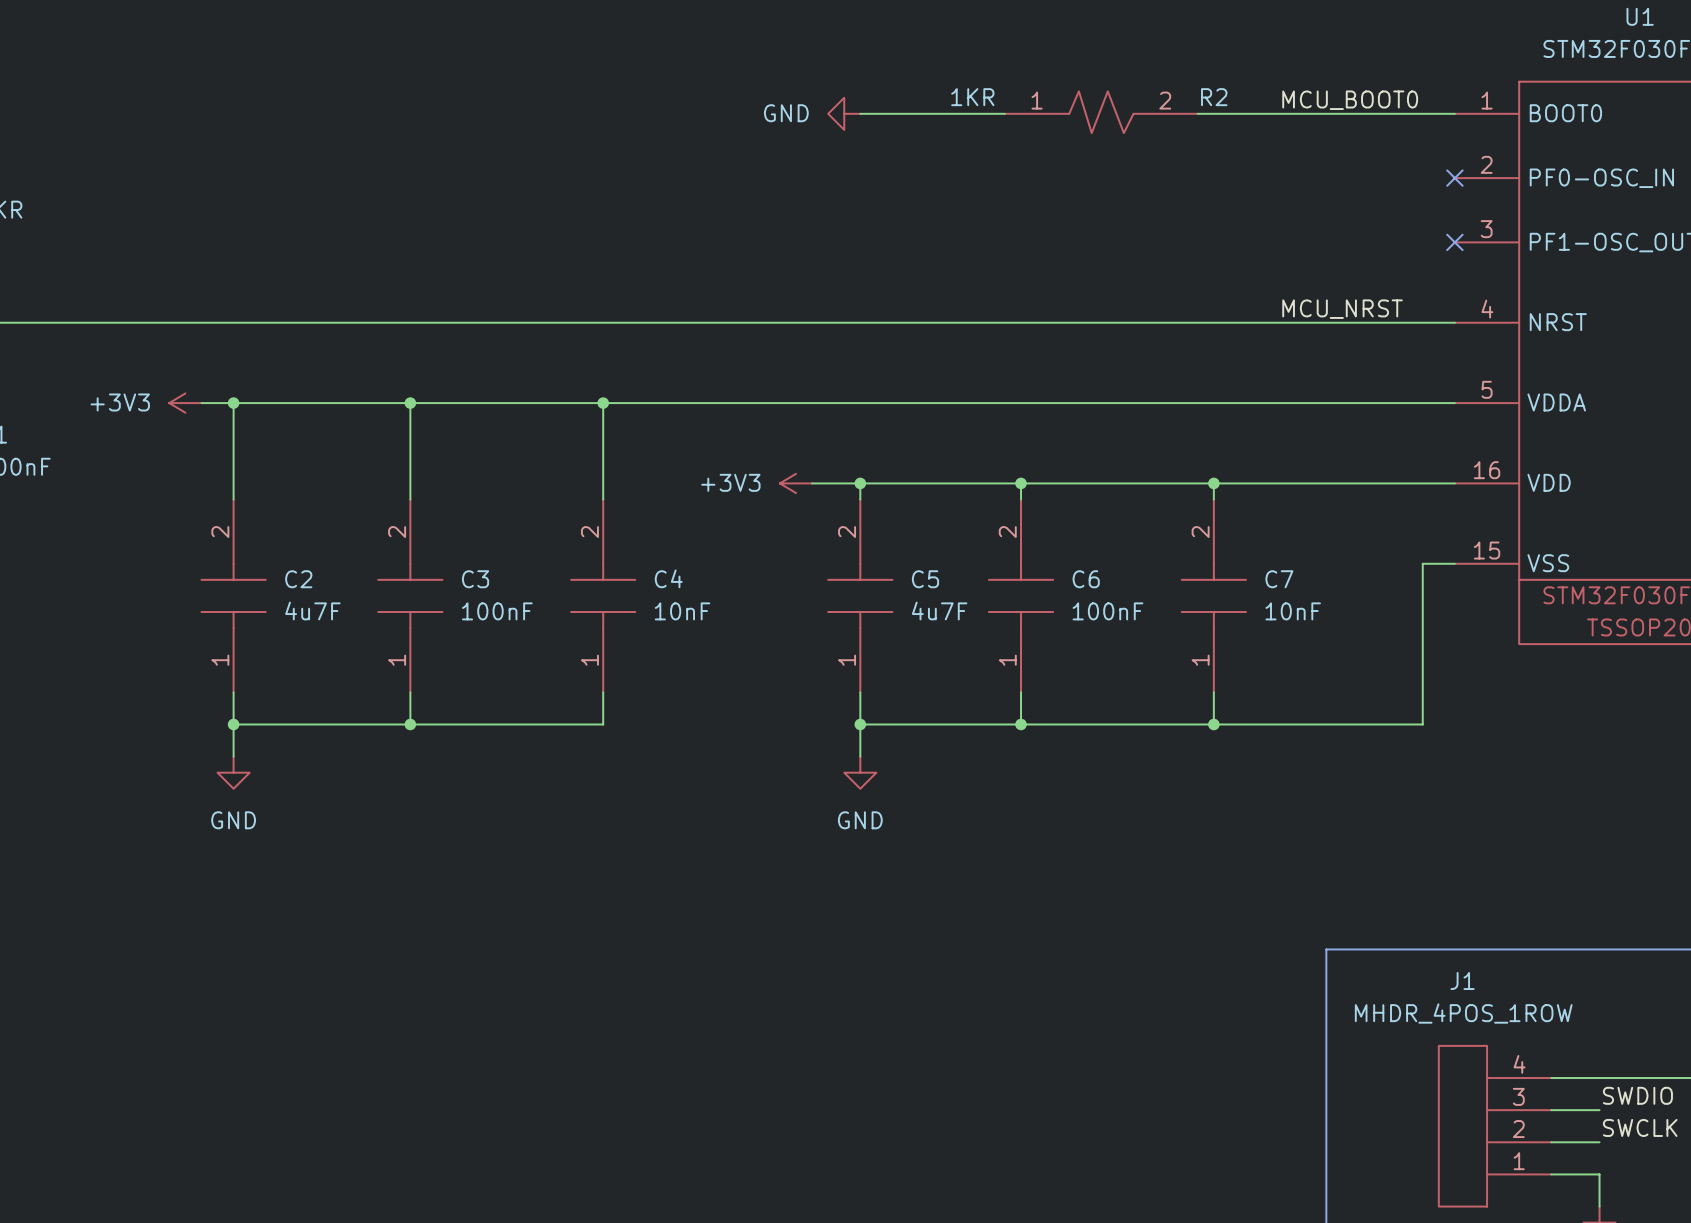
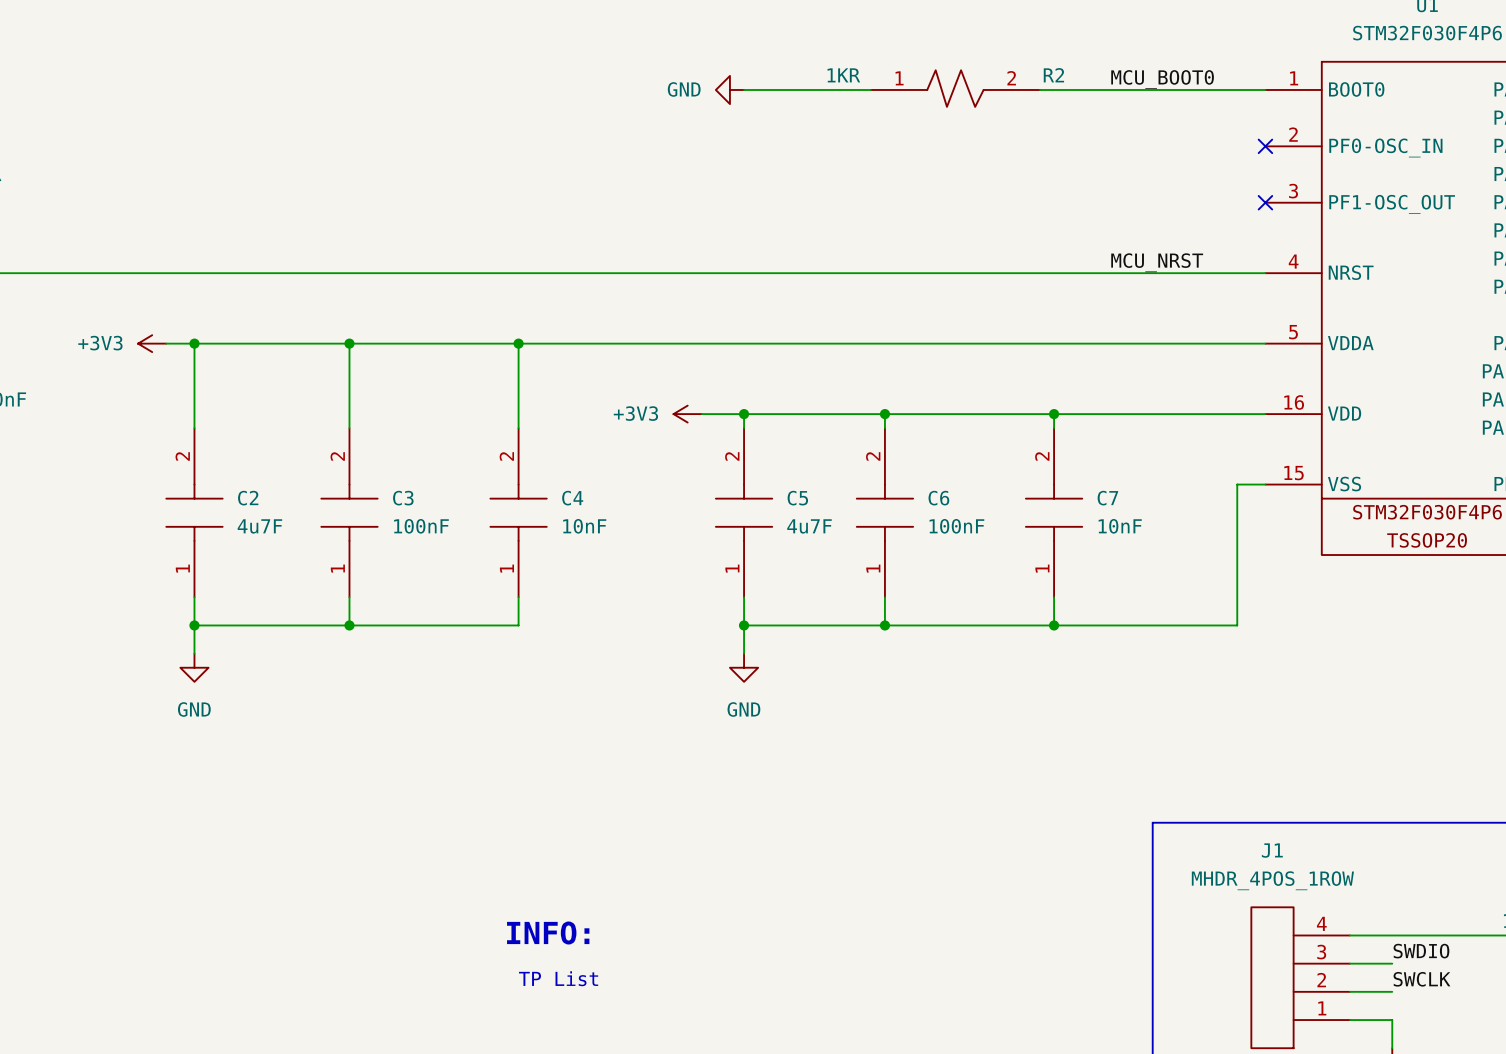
text: none -> INFO: (548, 933)
text: none -> TP List (558, 978)

